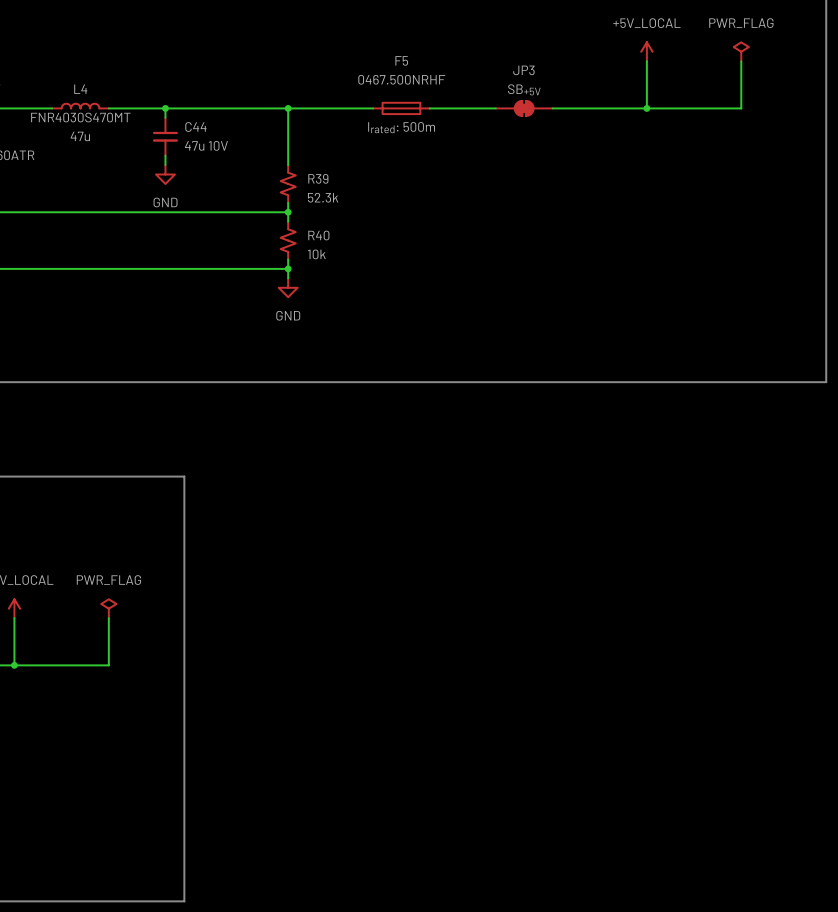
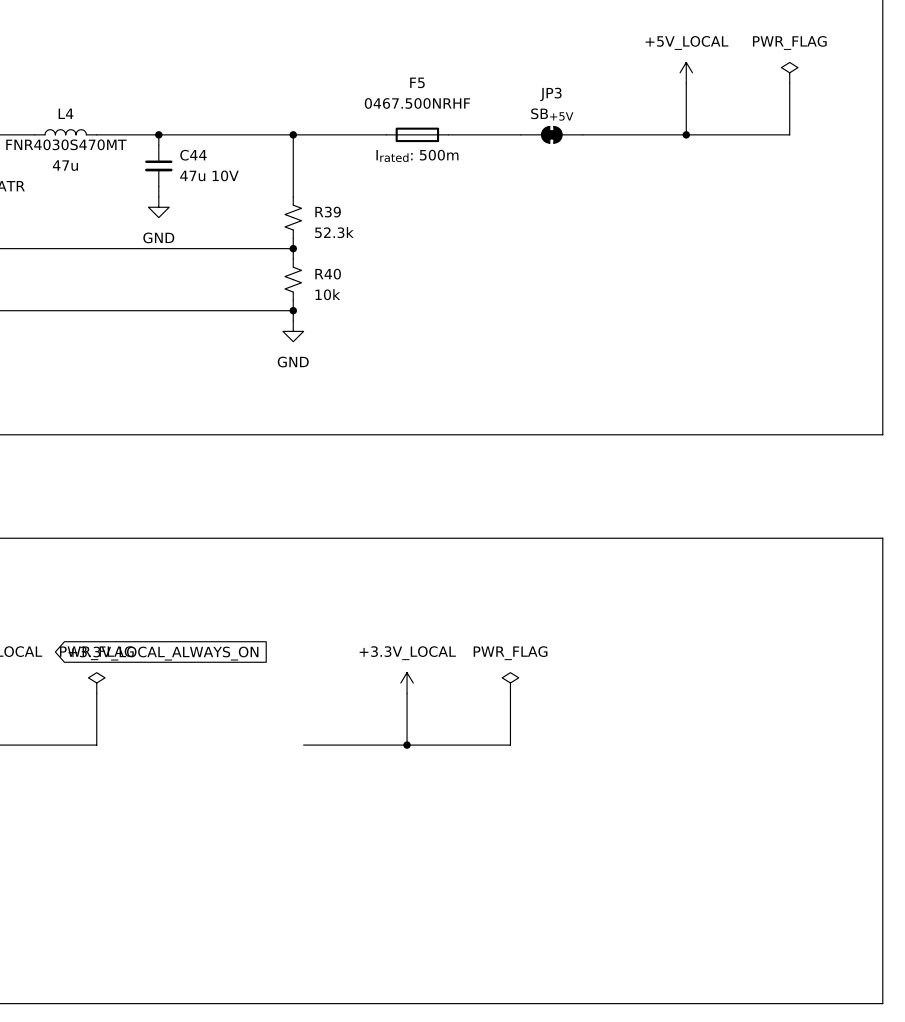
line: (184, 476) (184, 901) -> (179, 538) (882, 538) (882, 1003) (179, 1003)
global label: none -> +3.3V_LOCAL_ALWAYS_ON (163, 653)
power symbol: none -> +3.3V_LOCAL (407, 683)
power symbol: none -> PWR_FLAG (510, 683)
wire: none -> (407, 693) (407, 745)
wire: none -> (510, 693) (510, 745) (303, 745)
junction: none -> (407, 745)

